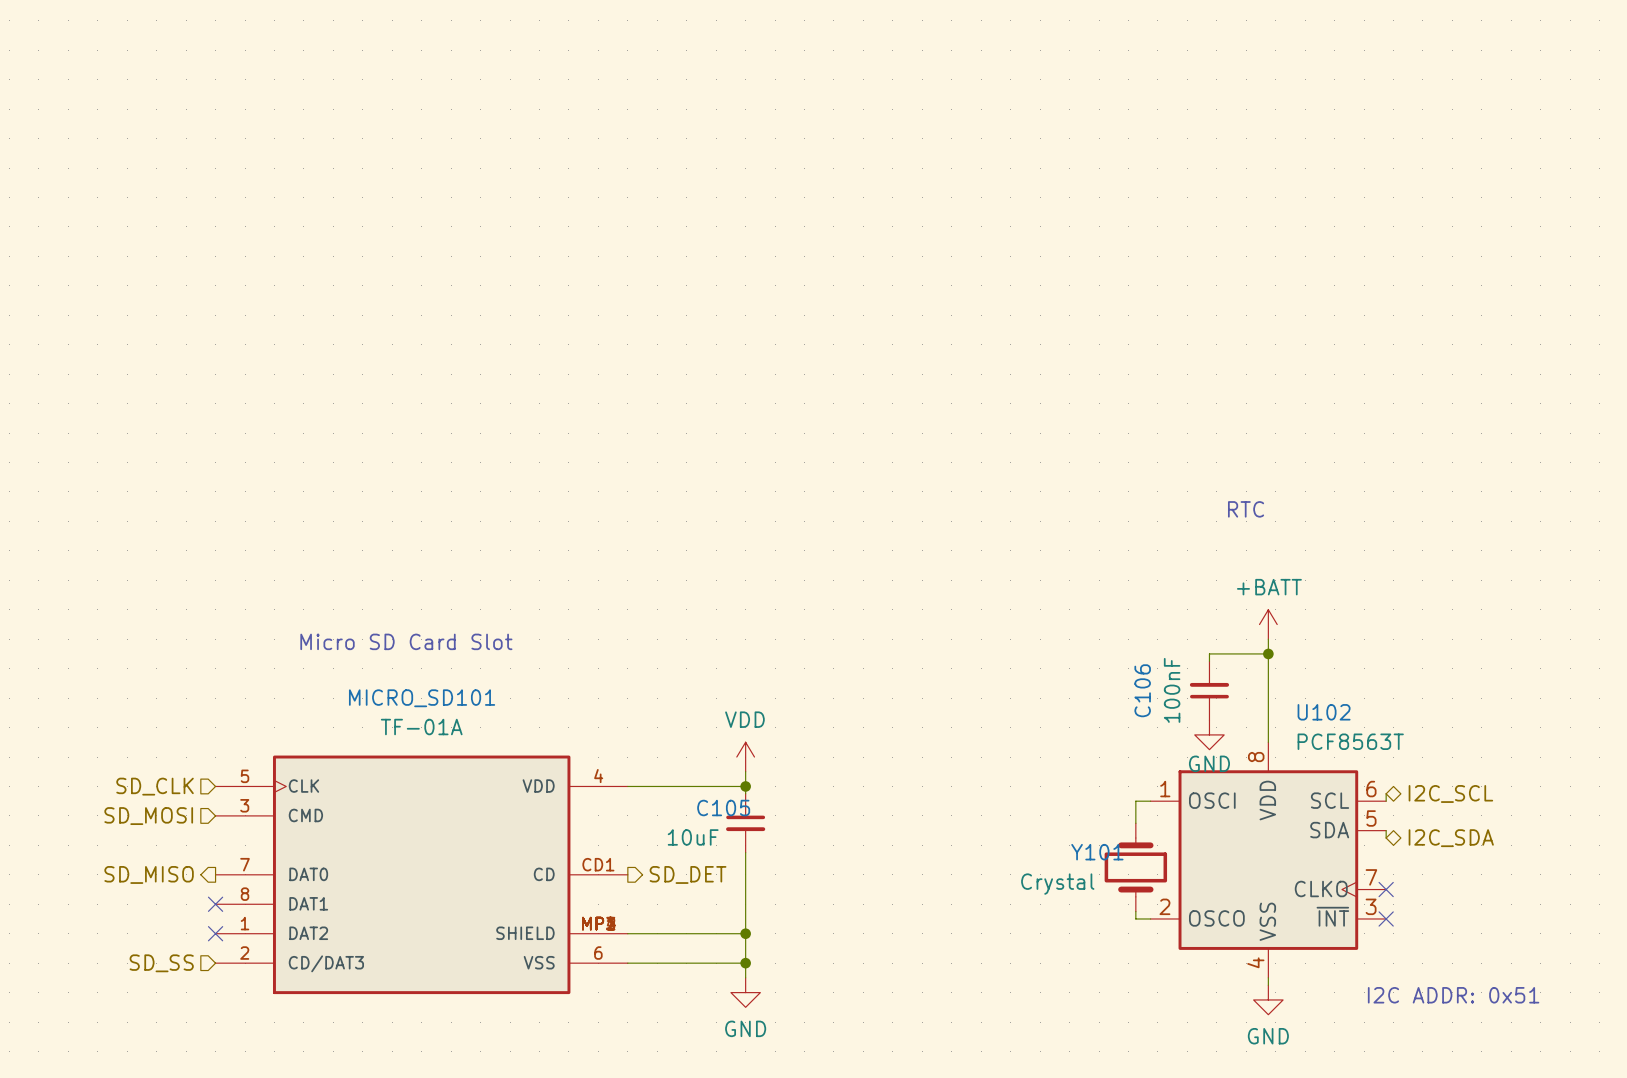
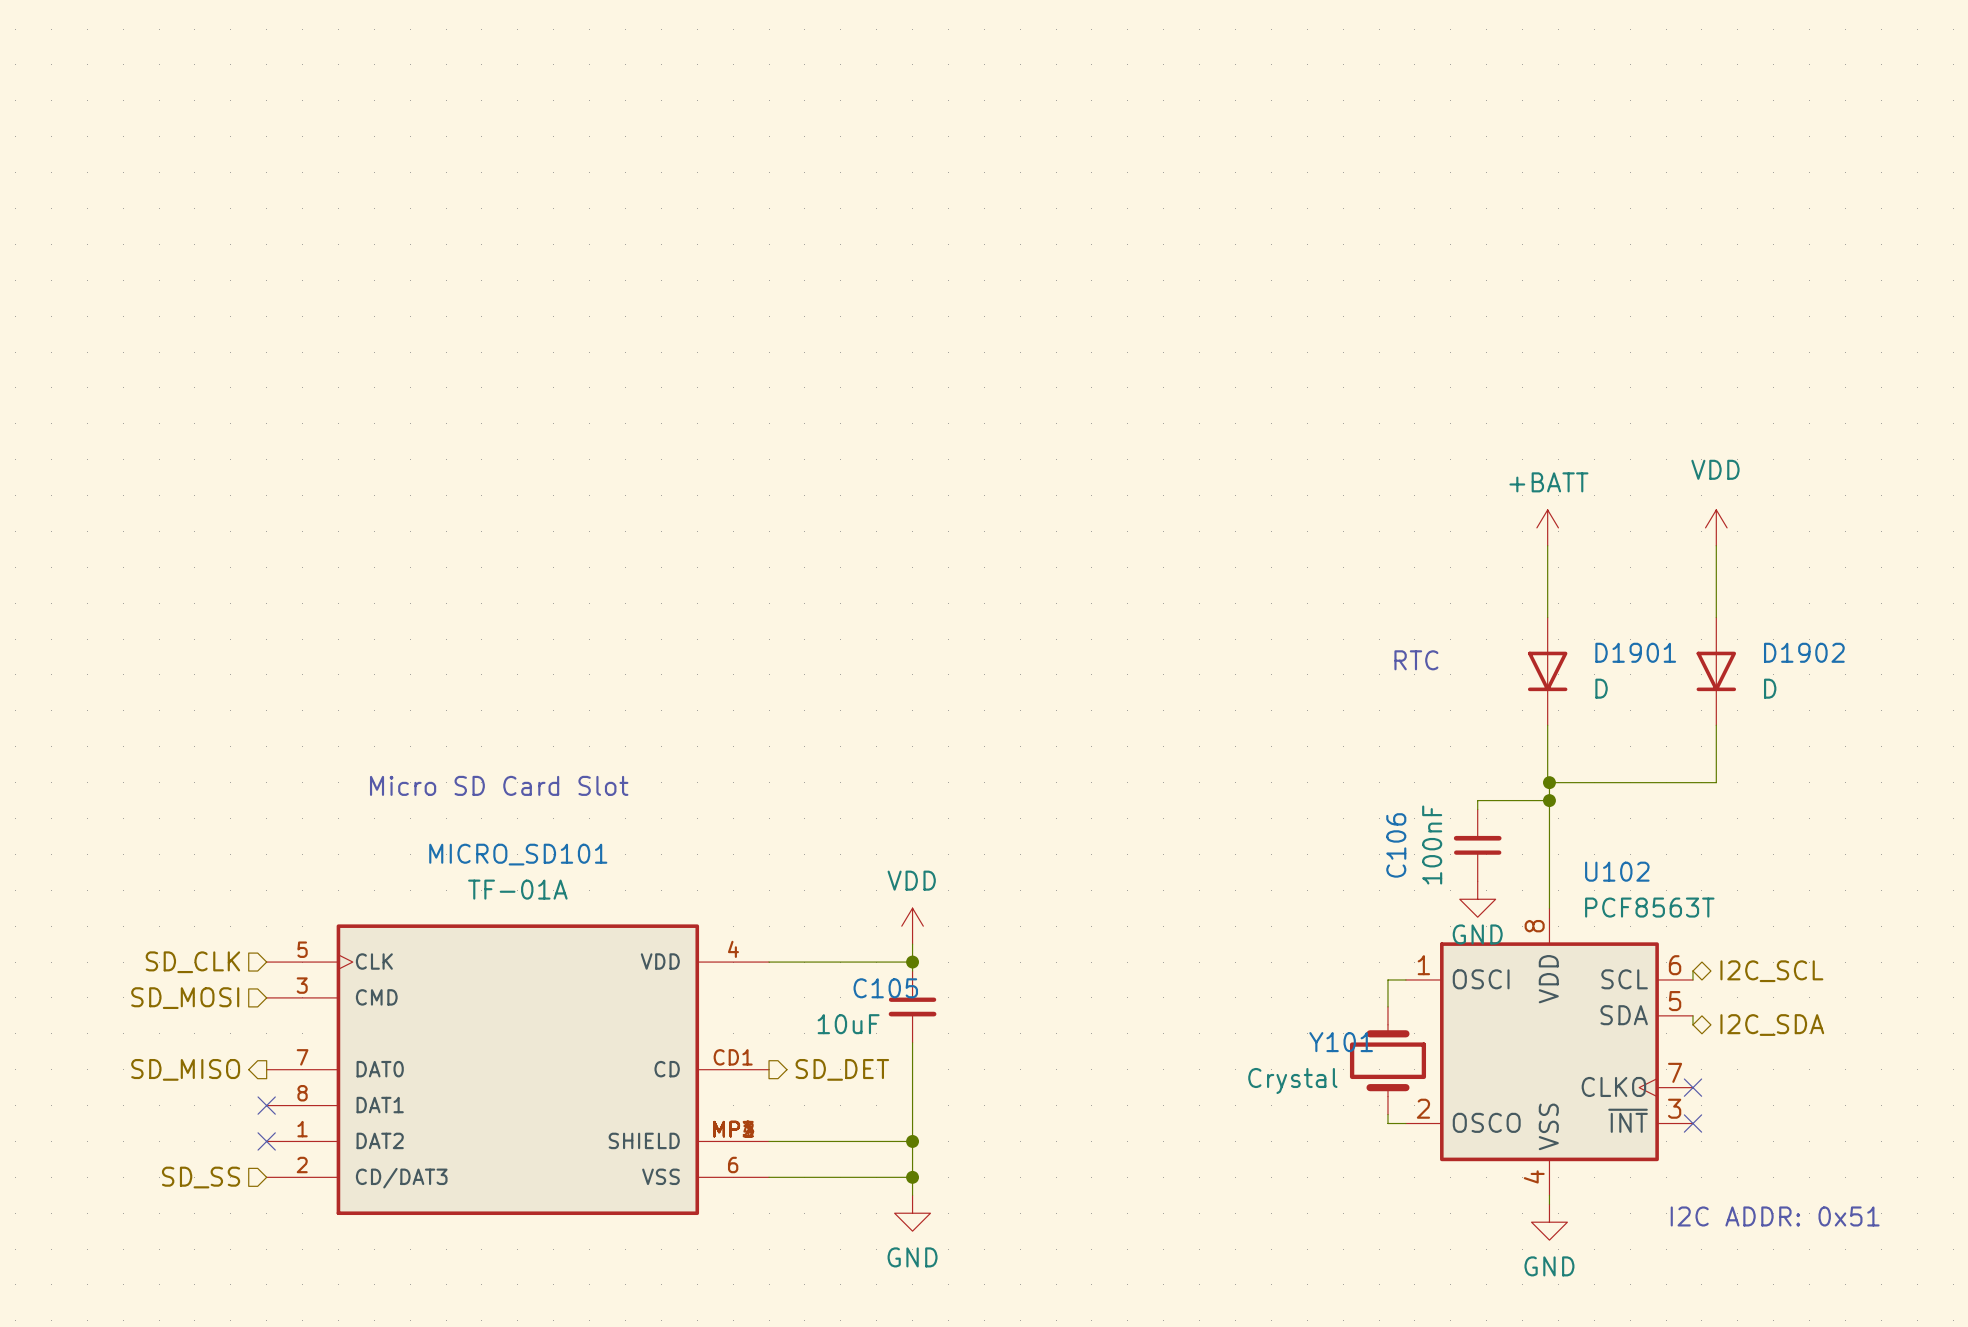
power symbol: none -> VDD (1716, 527)
wire: none -> (1547, 545) (1547, 617)
wire: none -> (1716, 545) (1716, 617)
text position: RTC (1246, 509) -> RTC (1416, 660)
D1901: none -> D (1547, 671)
D1902: none -> D (1716, 671)
wire: none -> (1547, 725) (1547, 782) (1716, 782) (1716, 725)
power symbol position: +BATT (1268, 624) -> +BATT (1547, 527)
junction: none -> (1549, 782)

